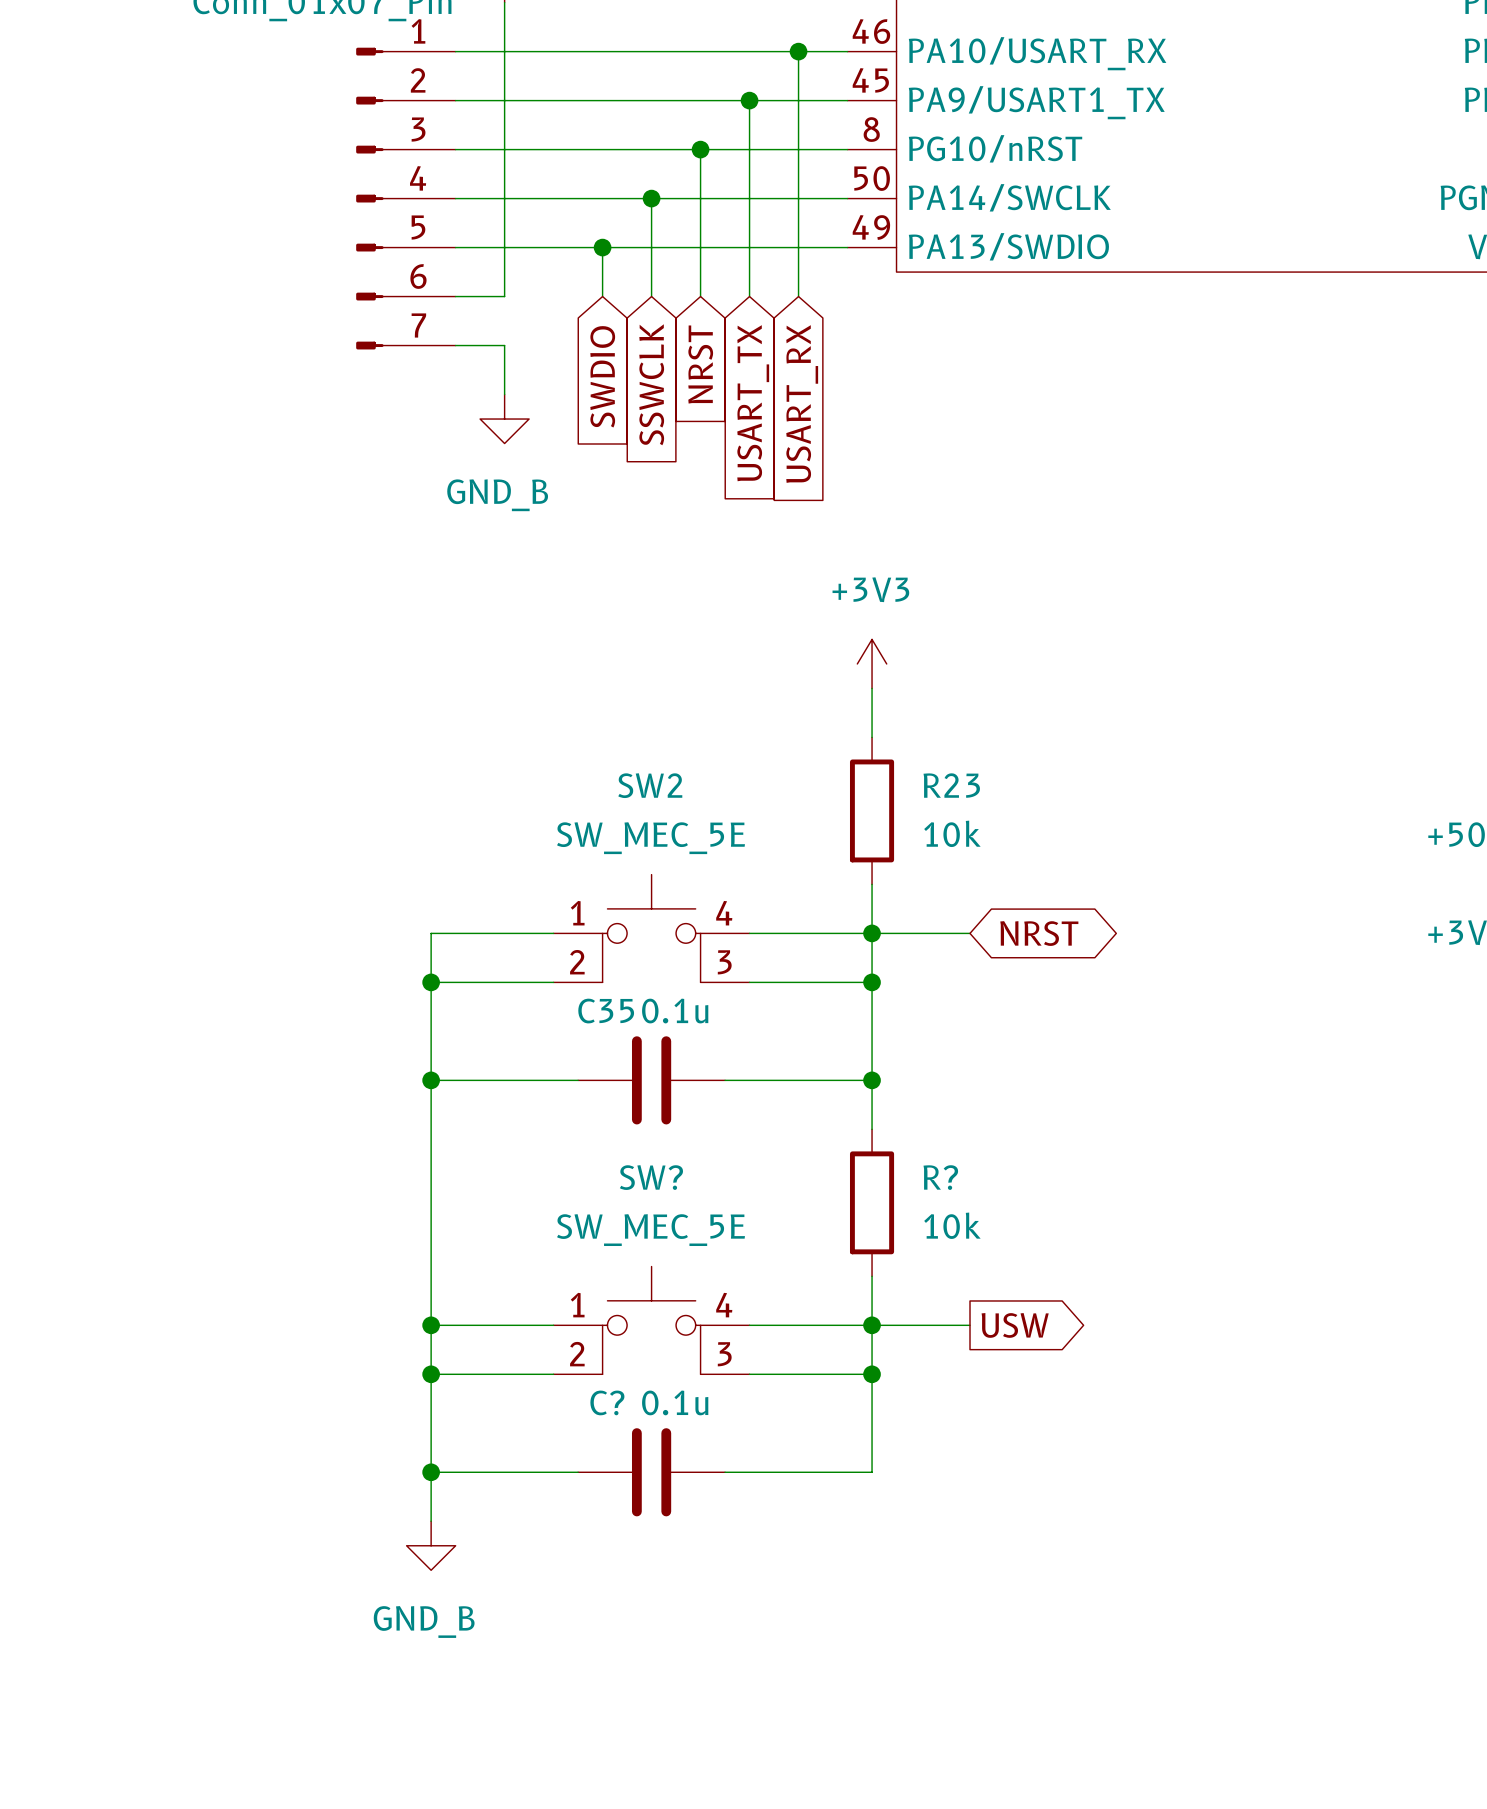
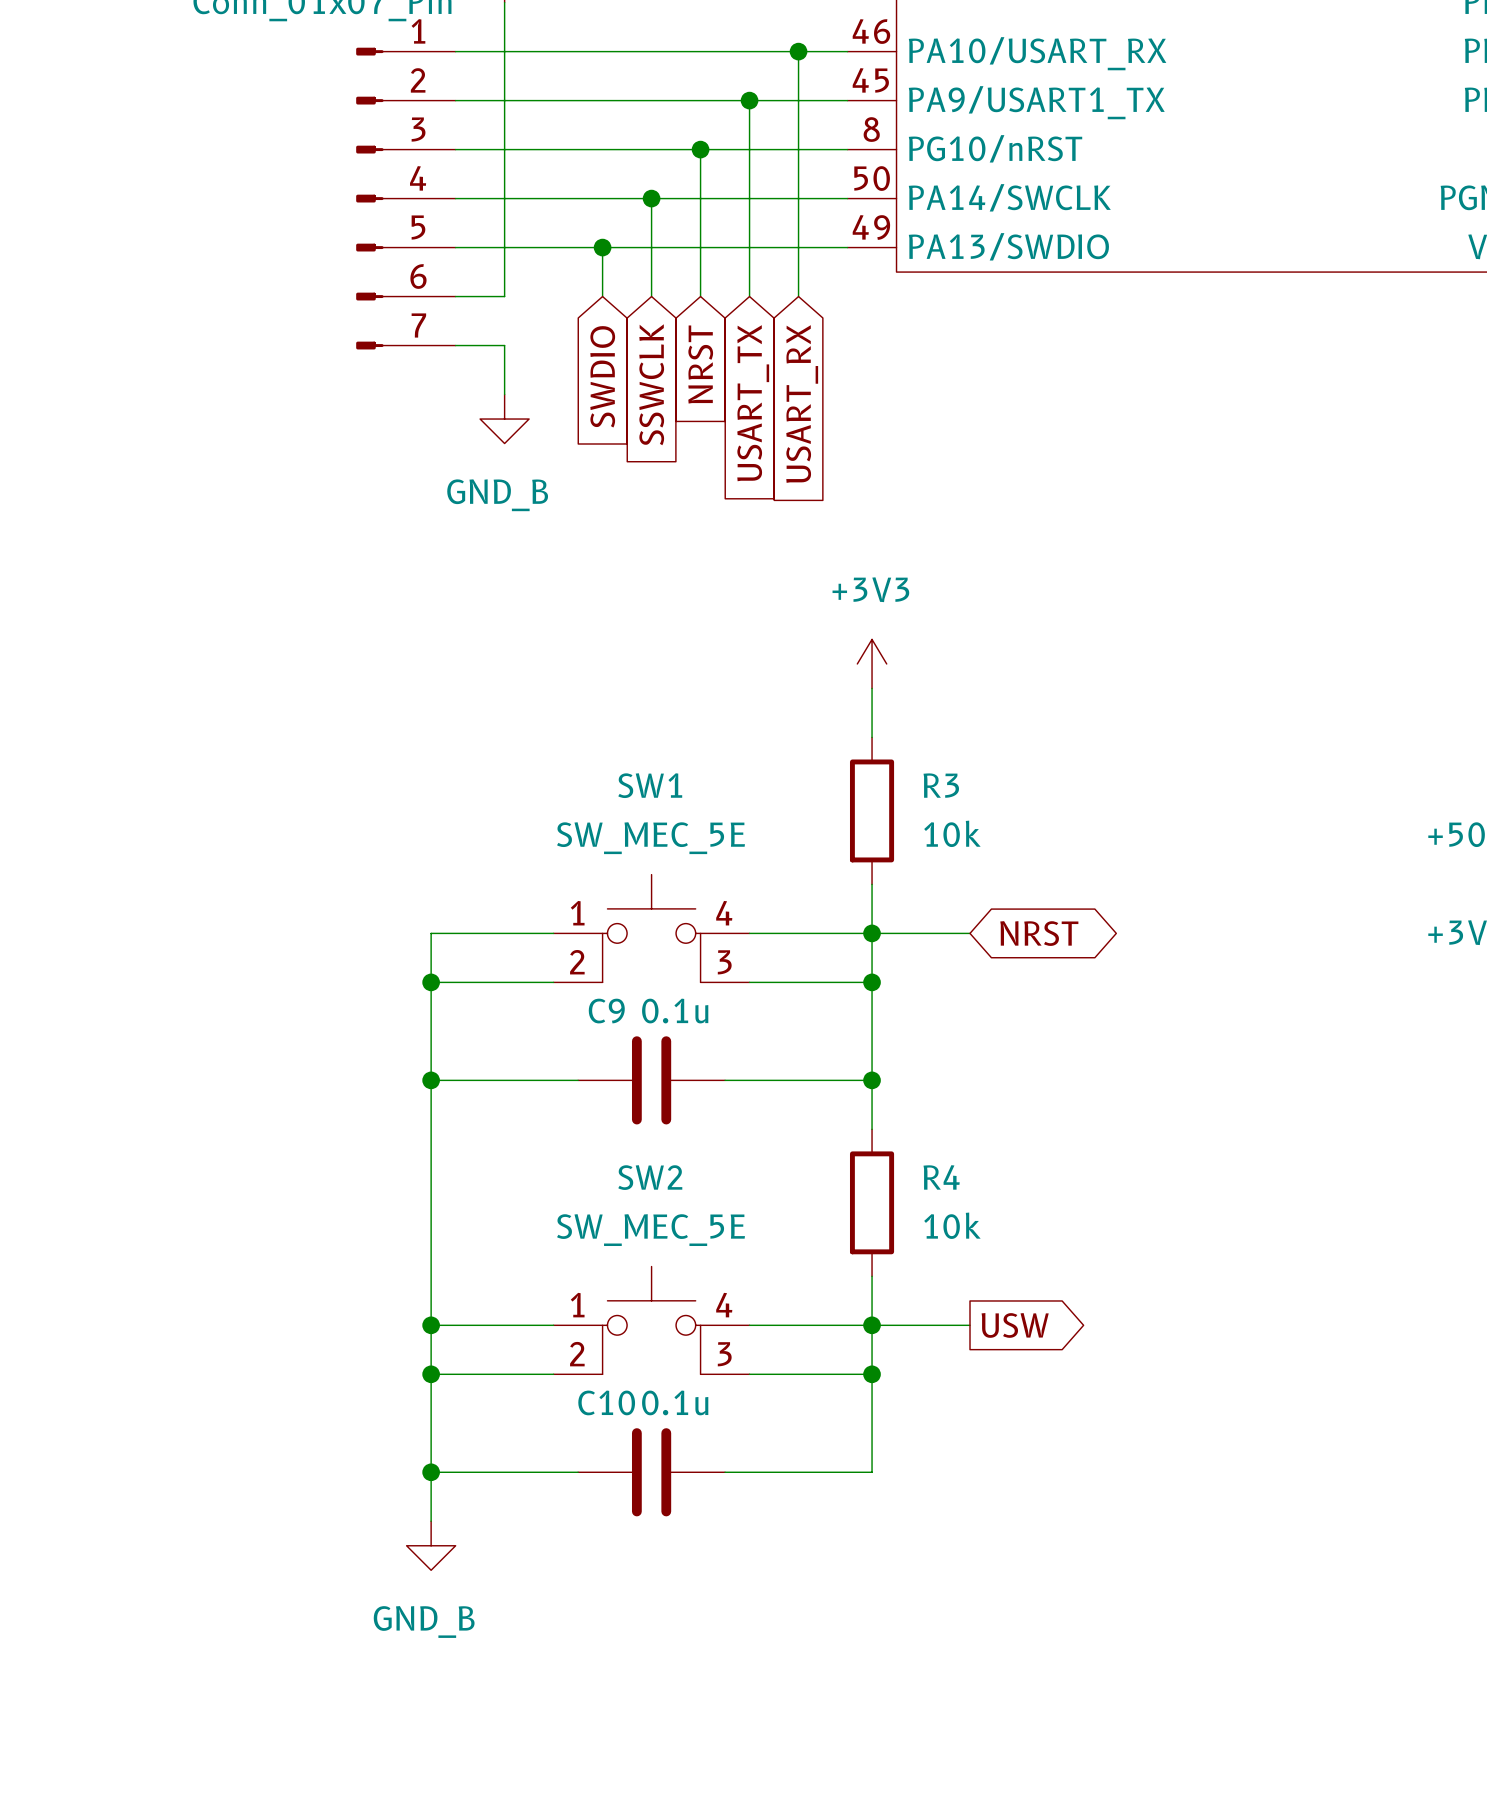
SW2 name: SW2 (650, 785) -> SW1 (650, 785)
R23 name: R23 (951, 785) -> R3 (941, 785)
C35 name: C35 (606, 1011) -> C9 (606, 1011)
SW? name: SW? (651, 1177) -> SW2 (650, 1177)
R? name: R? (940, 1177) -> R4 (941, 1177)
C? name: C? (607, 1402) -> C10 (606, 1402)

